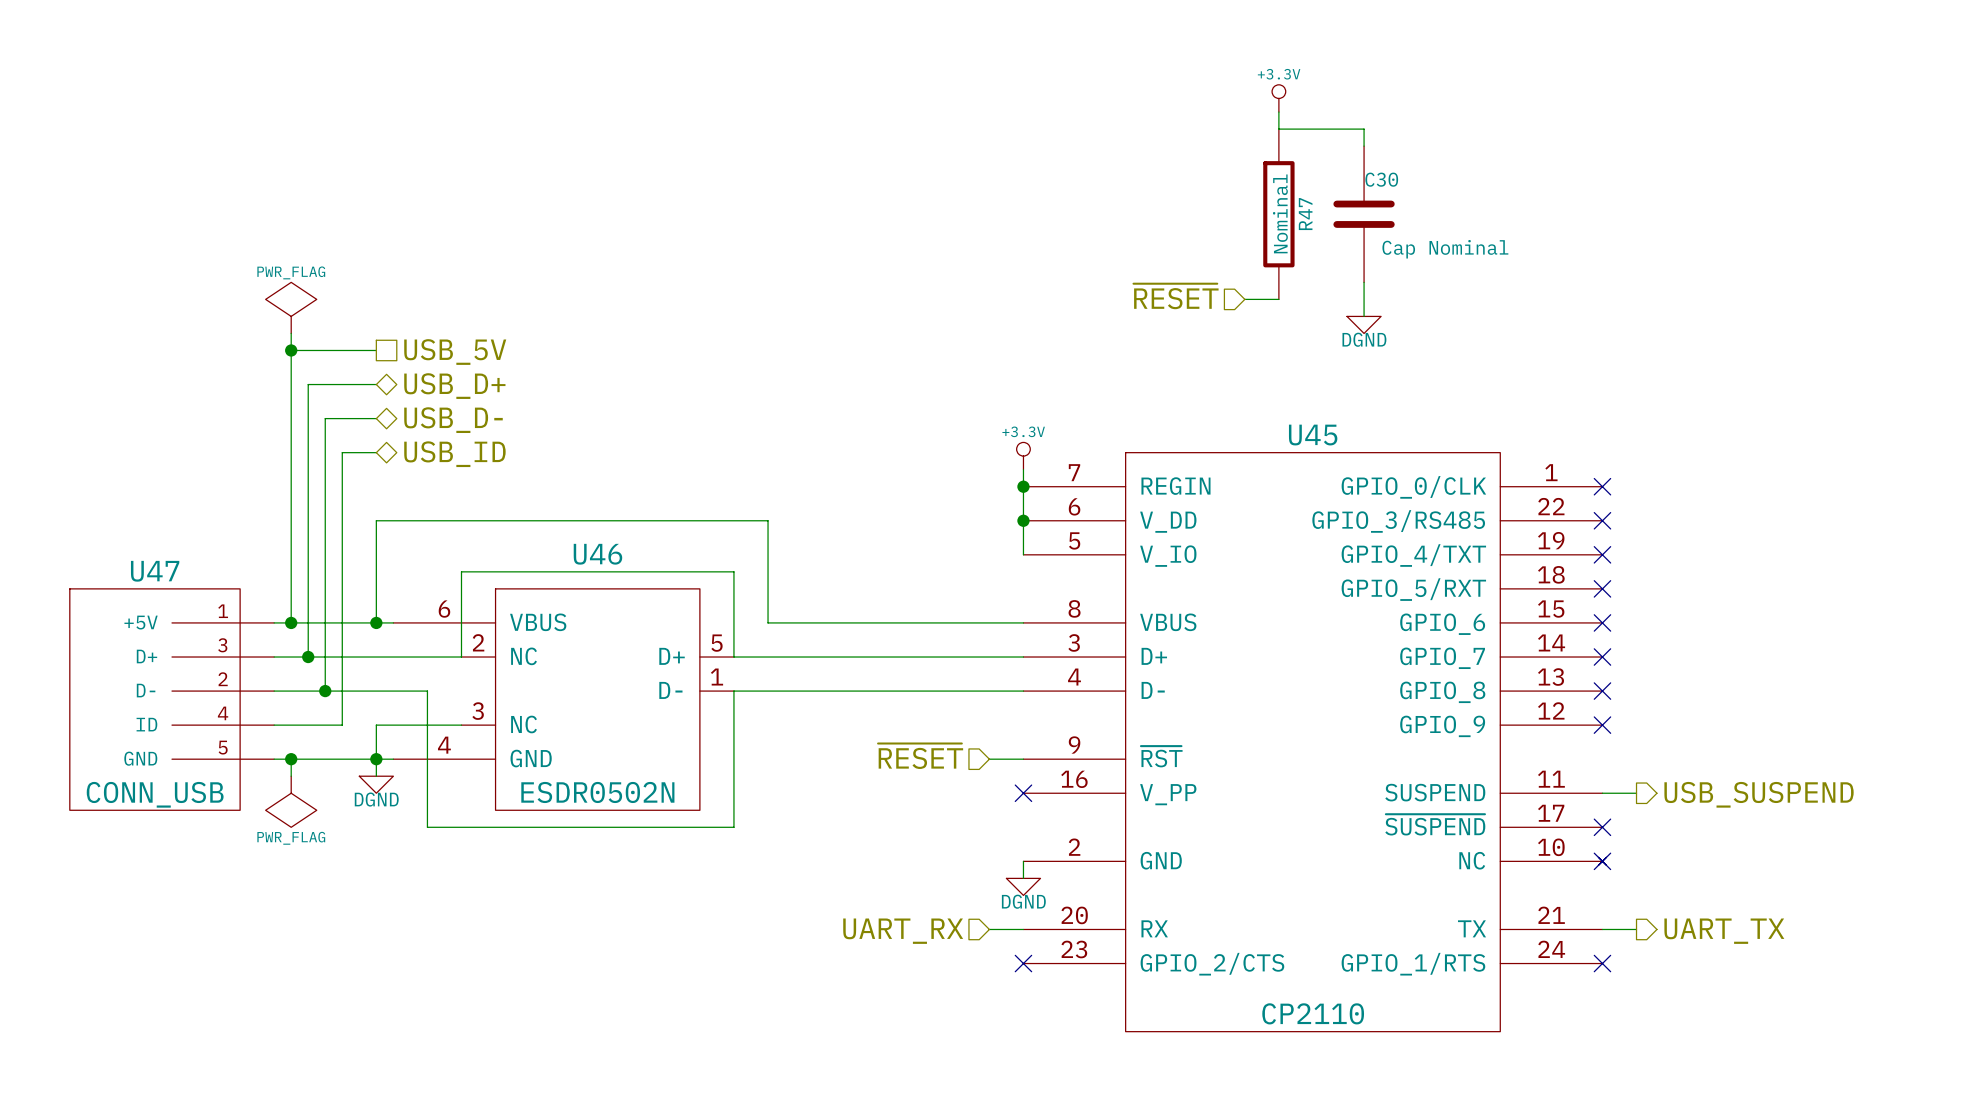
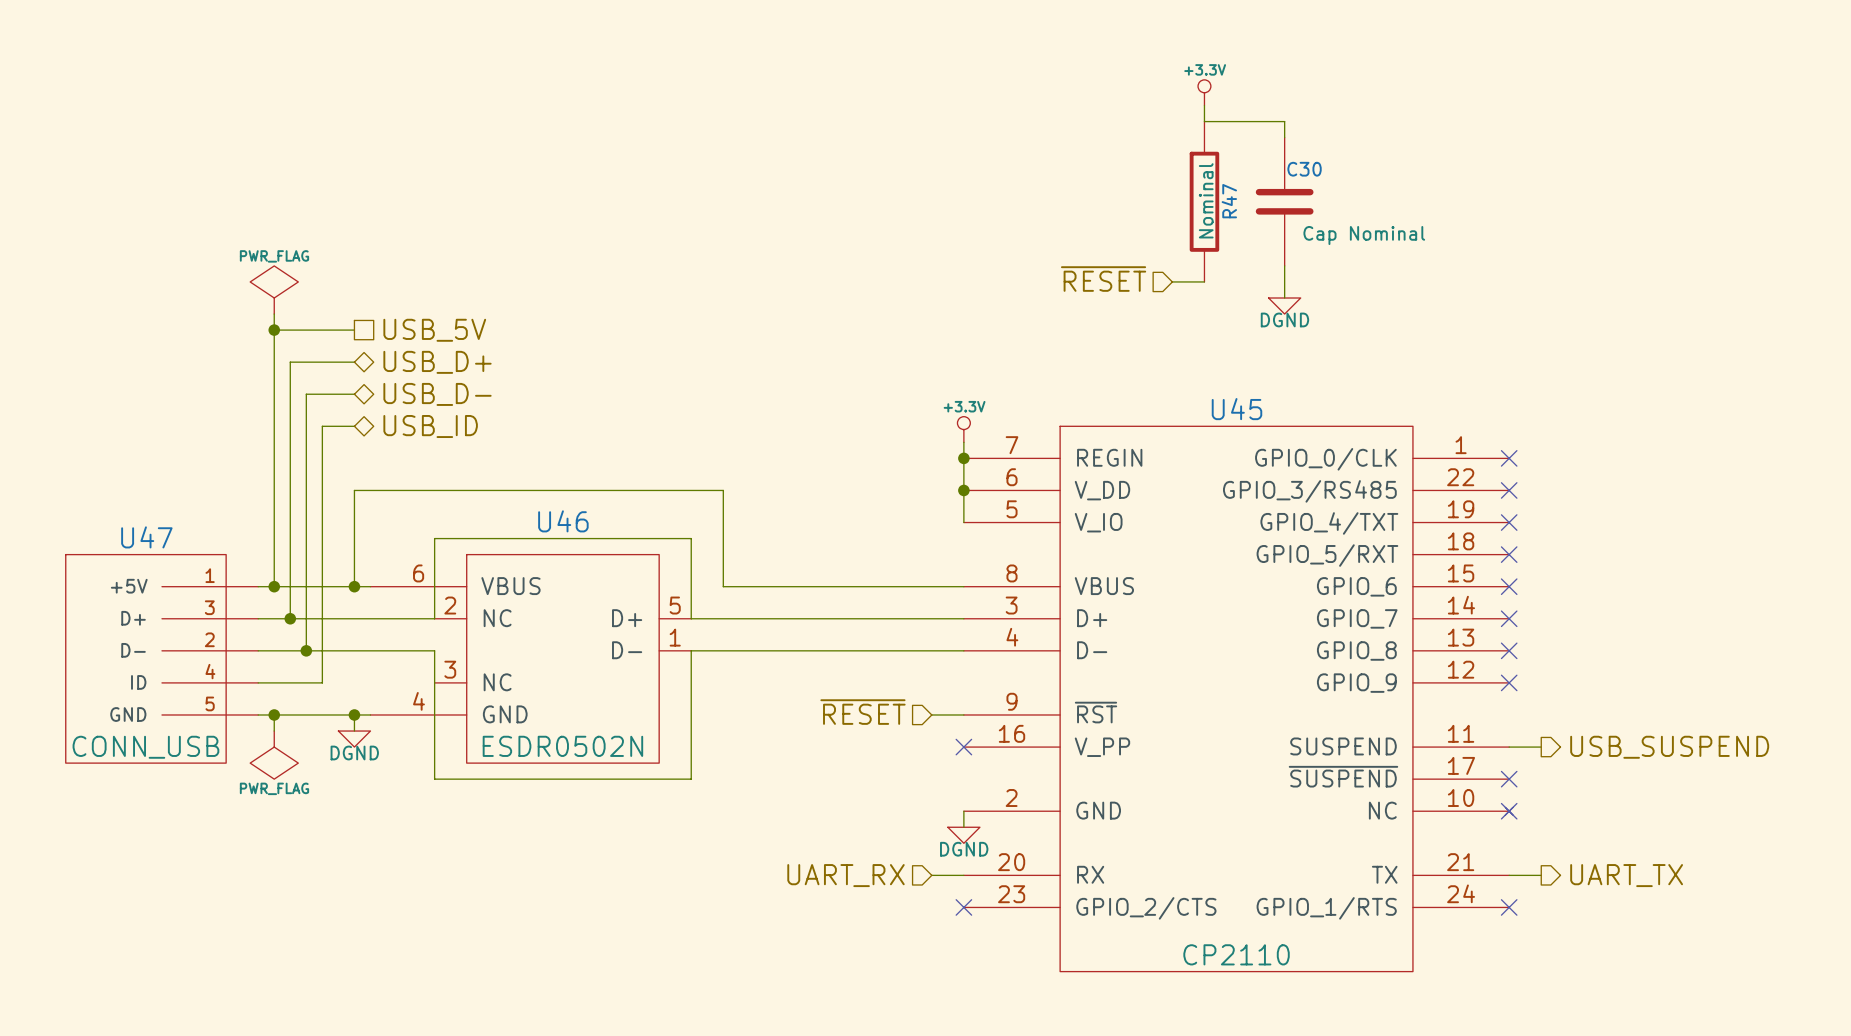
wire: (427, 691) (427, 827) (461, 827) -> (402, 650) (434, 650) (434, 779)
wire: (461, 725) (376, 725) (376, 759) -> none

